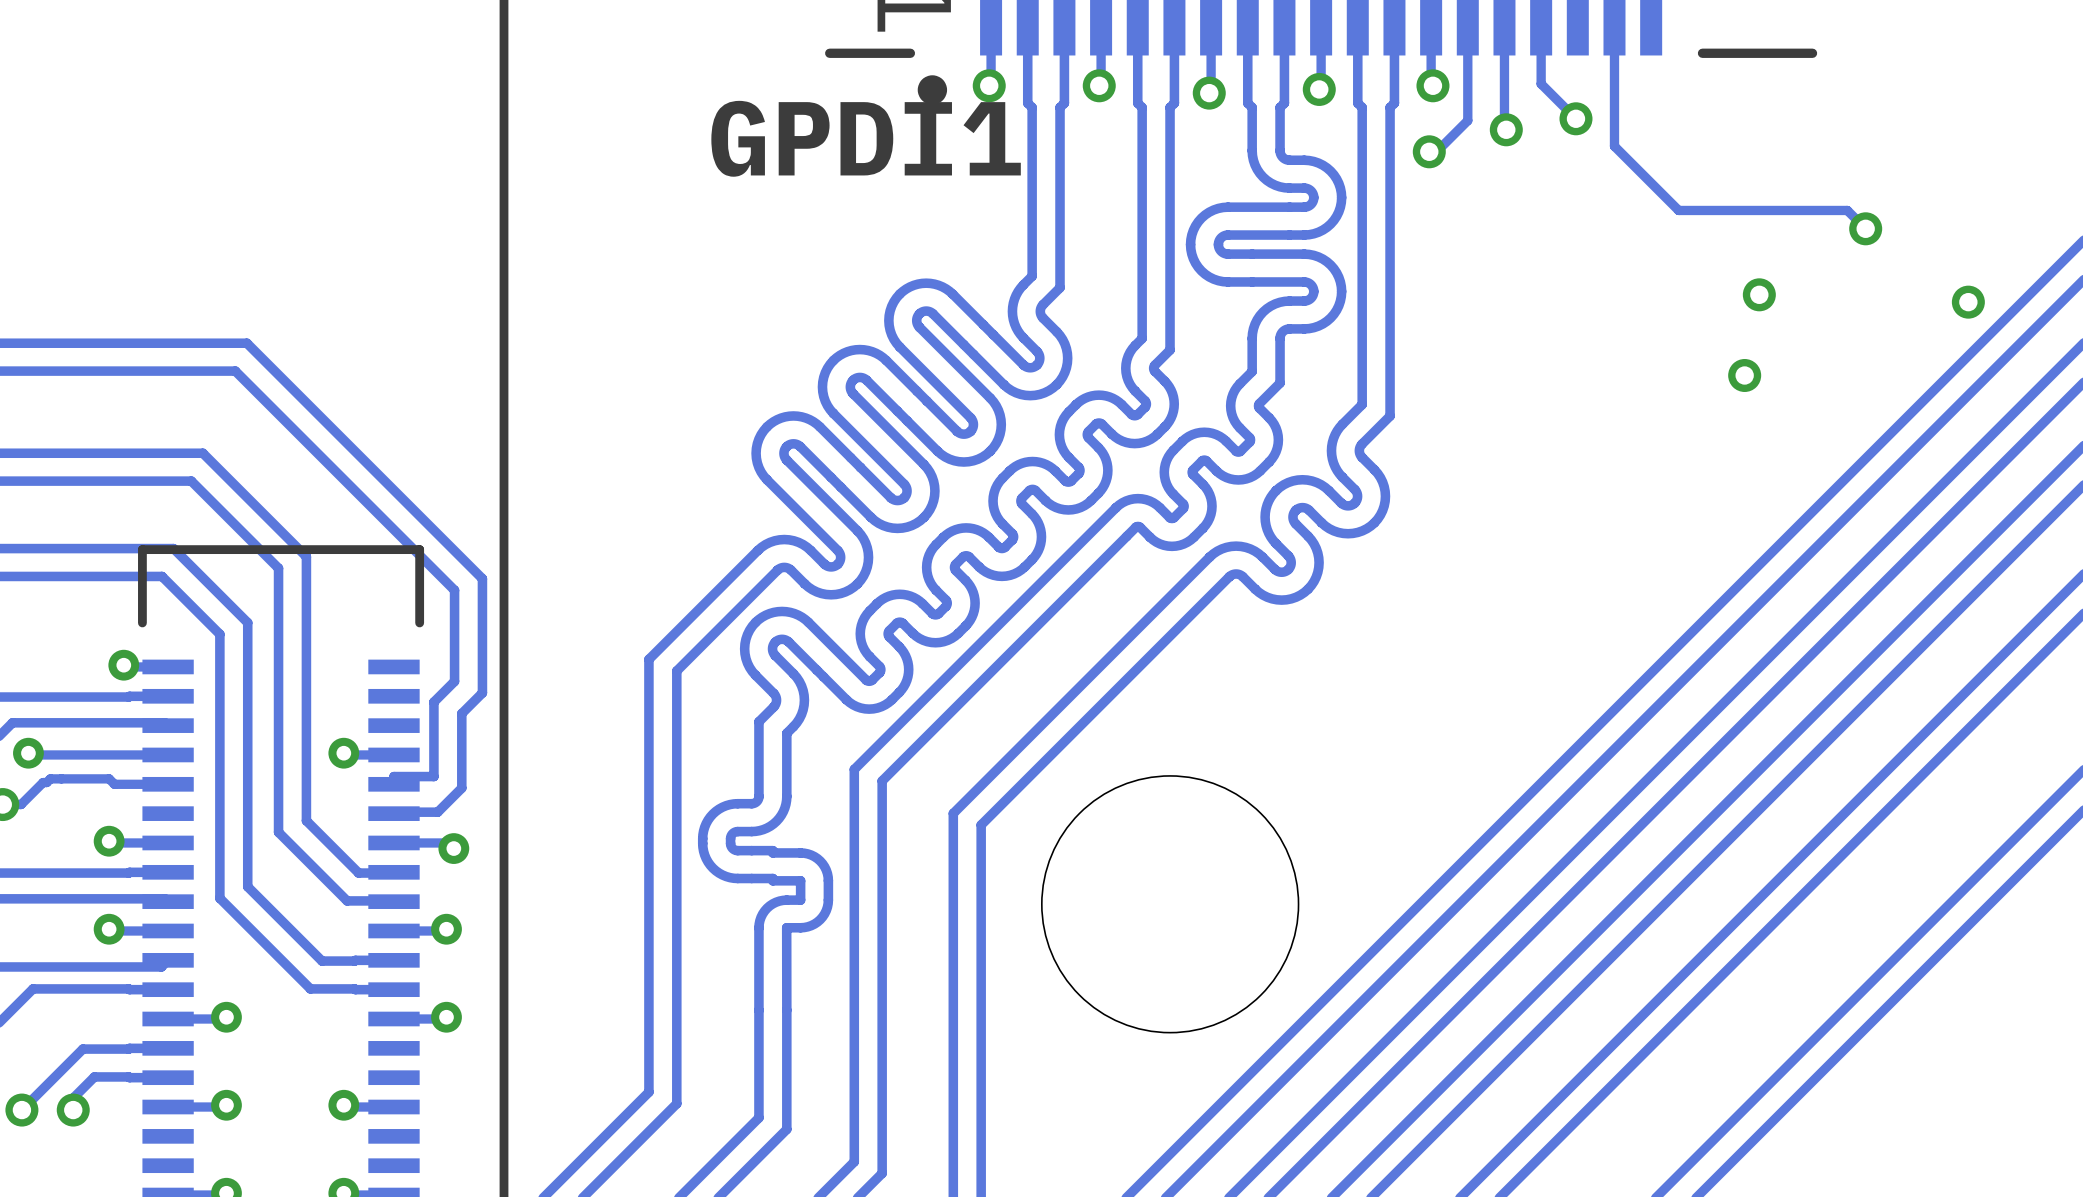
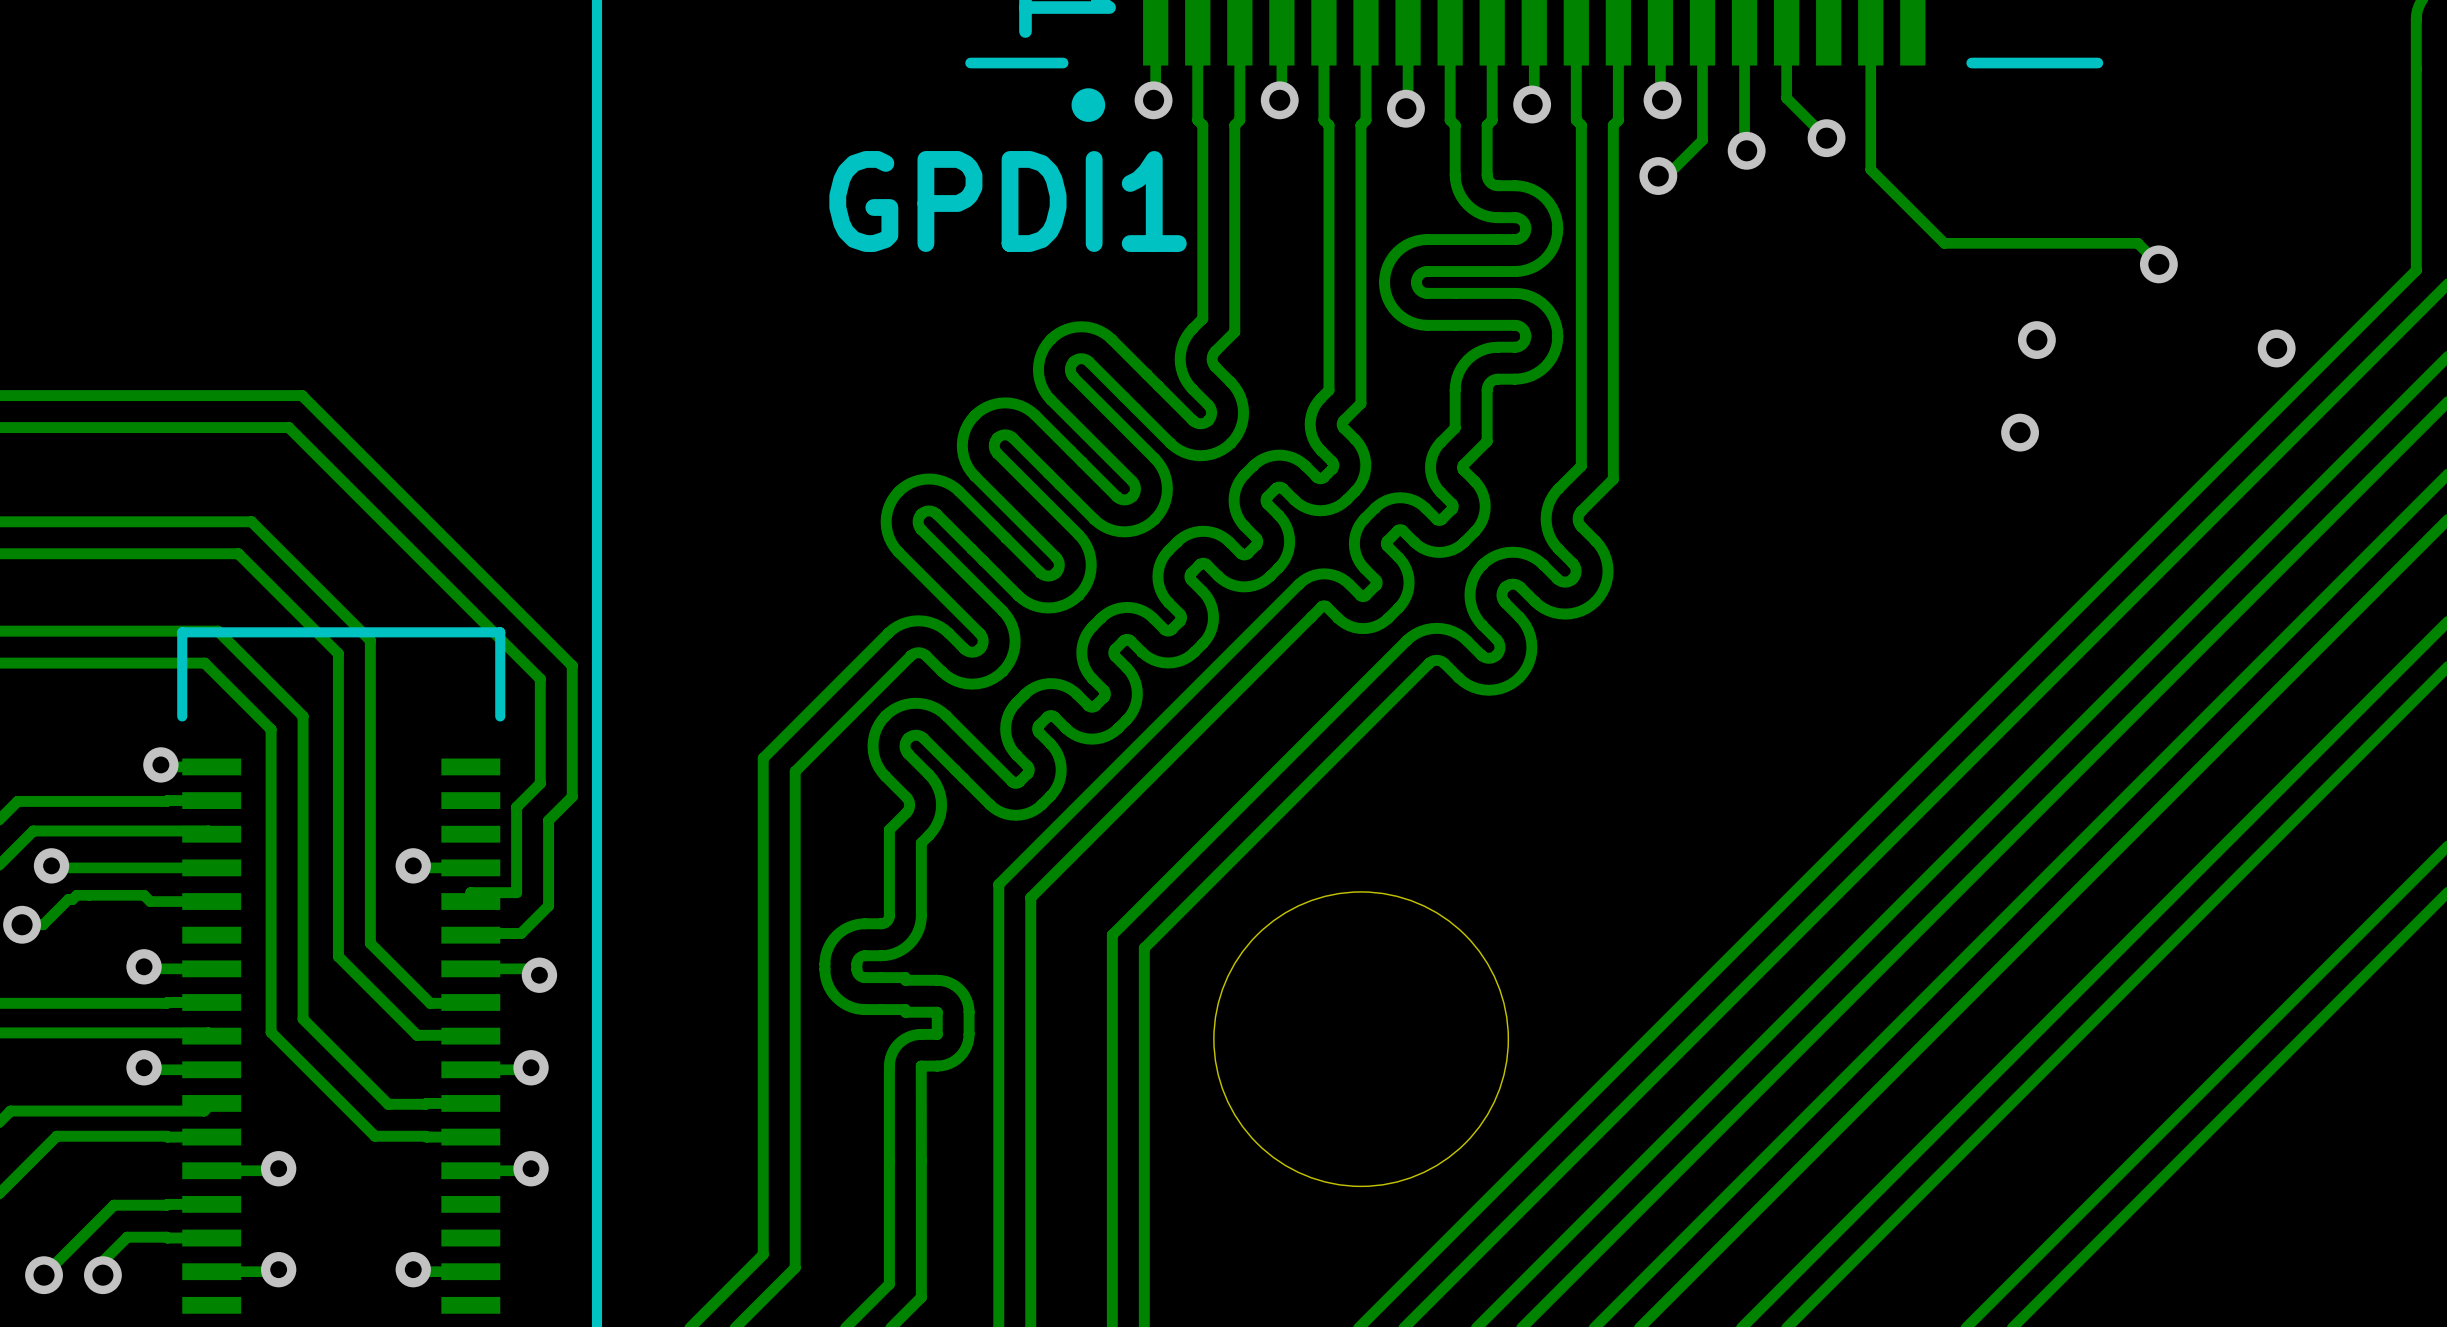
text position: GPDI1 (866, 138) -> GPDI1 (1008, 201)

